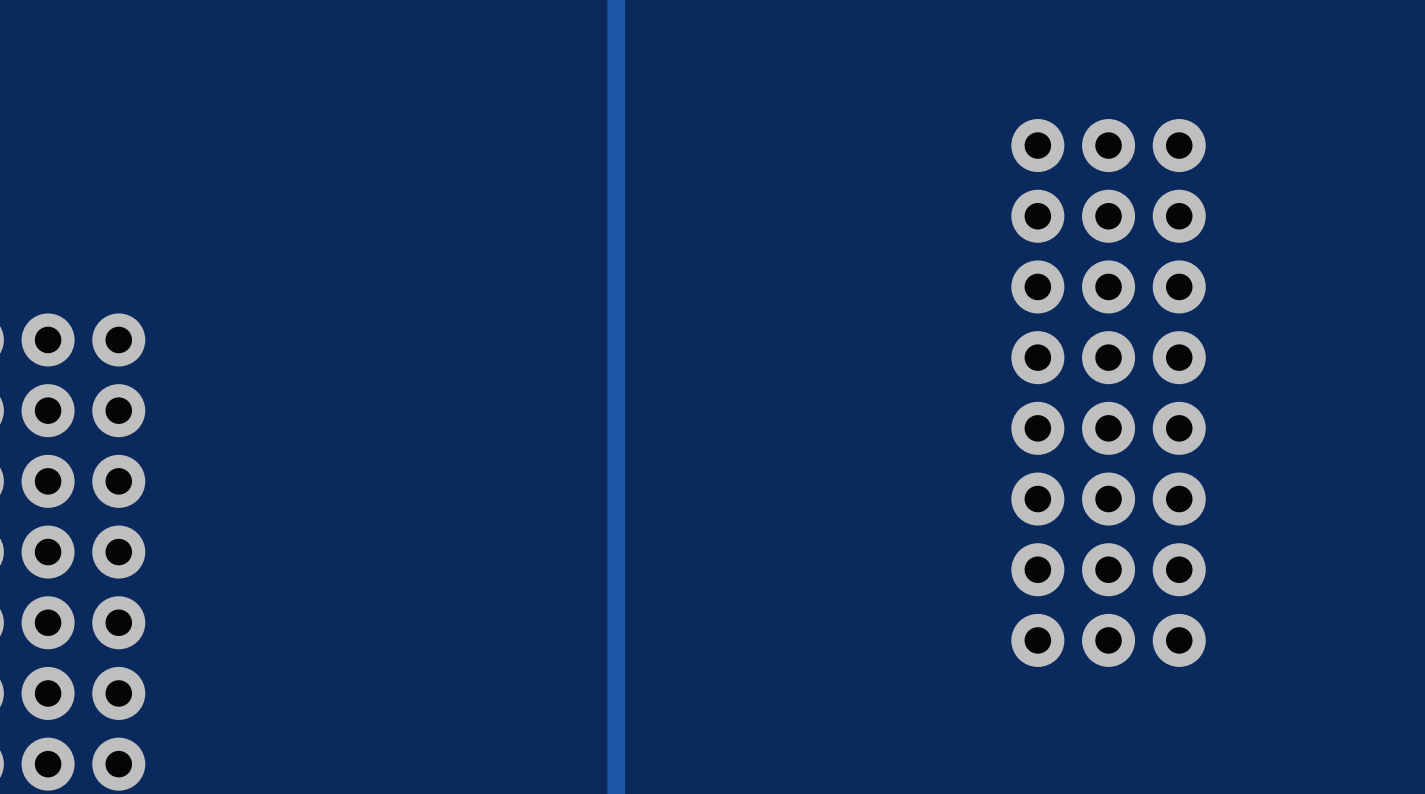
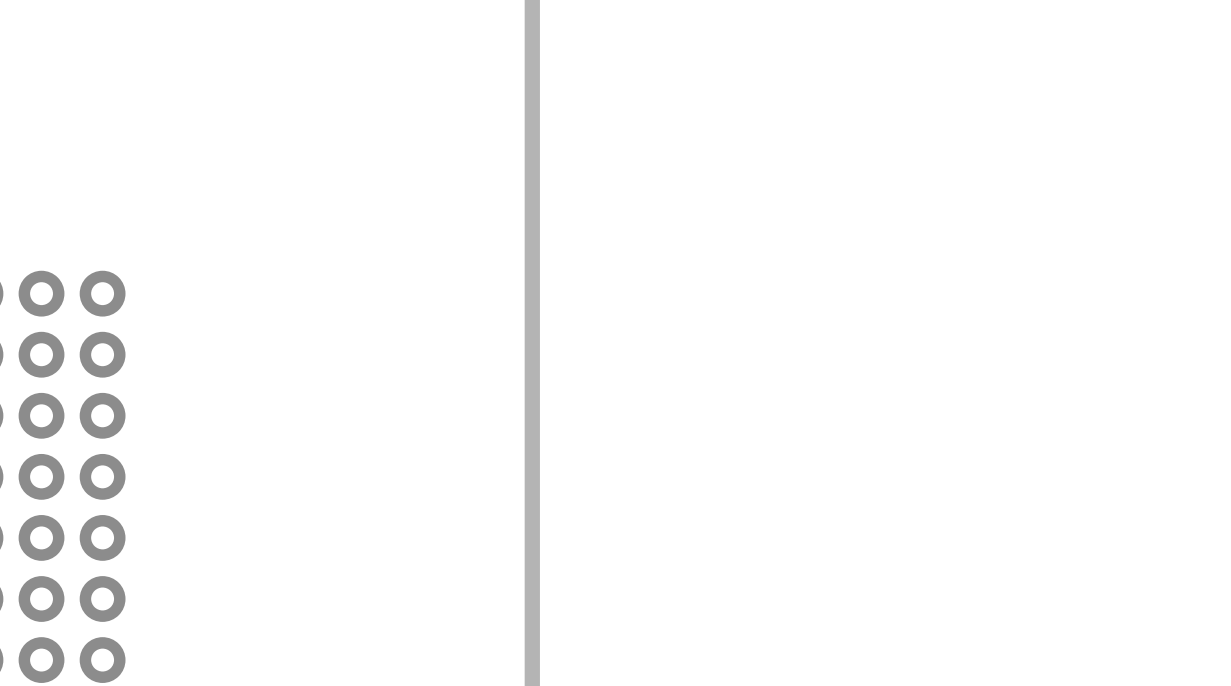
via: (1037, 145) -> none
via: (1108, 145) -> none
via: (1179, 145) -> none
via: (1037, 216) -> none
via: (1108, 216) -> none
via: (1179, 216) -> none
via: (1037, 286) -> none
via: (1108, 286) -> none
via: (1179, 286) -> none
via: (1037, 357) -> none
via: (1108, 357) -> none
via: (1179, 357) -> none
via: (1037, 428) -> none
via: (1108, 428) -> none
via: (1179, 428) -> none
via: (1037, 499) -> none
via: (1108, 499) -> none
via: (1179, 499) -> none
via: (1037, 569) -> none
via: (1108, 569) -> none
via: (1179, 569) -> none
via: (1037, 640) -> none
via: (1108, 640) -> none
via: (1179, 640) -> none

